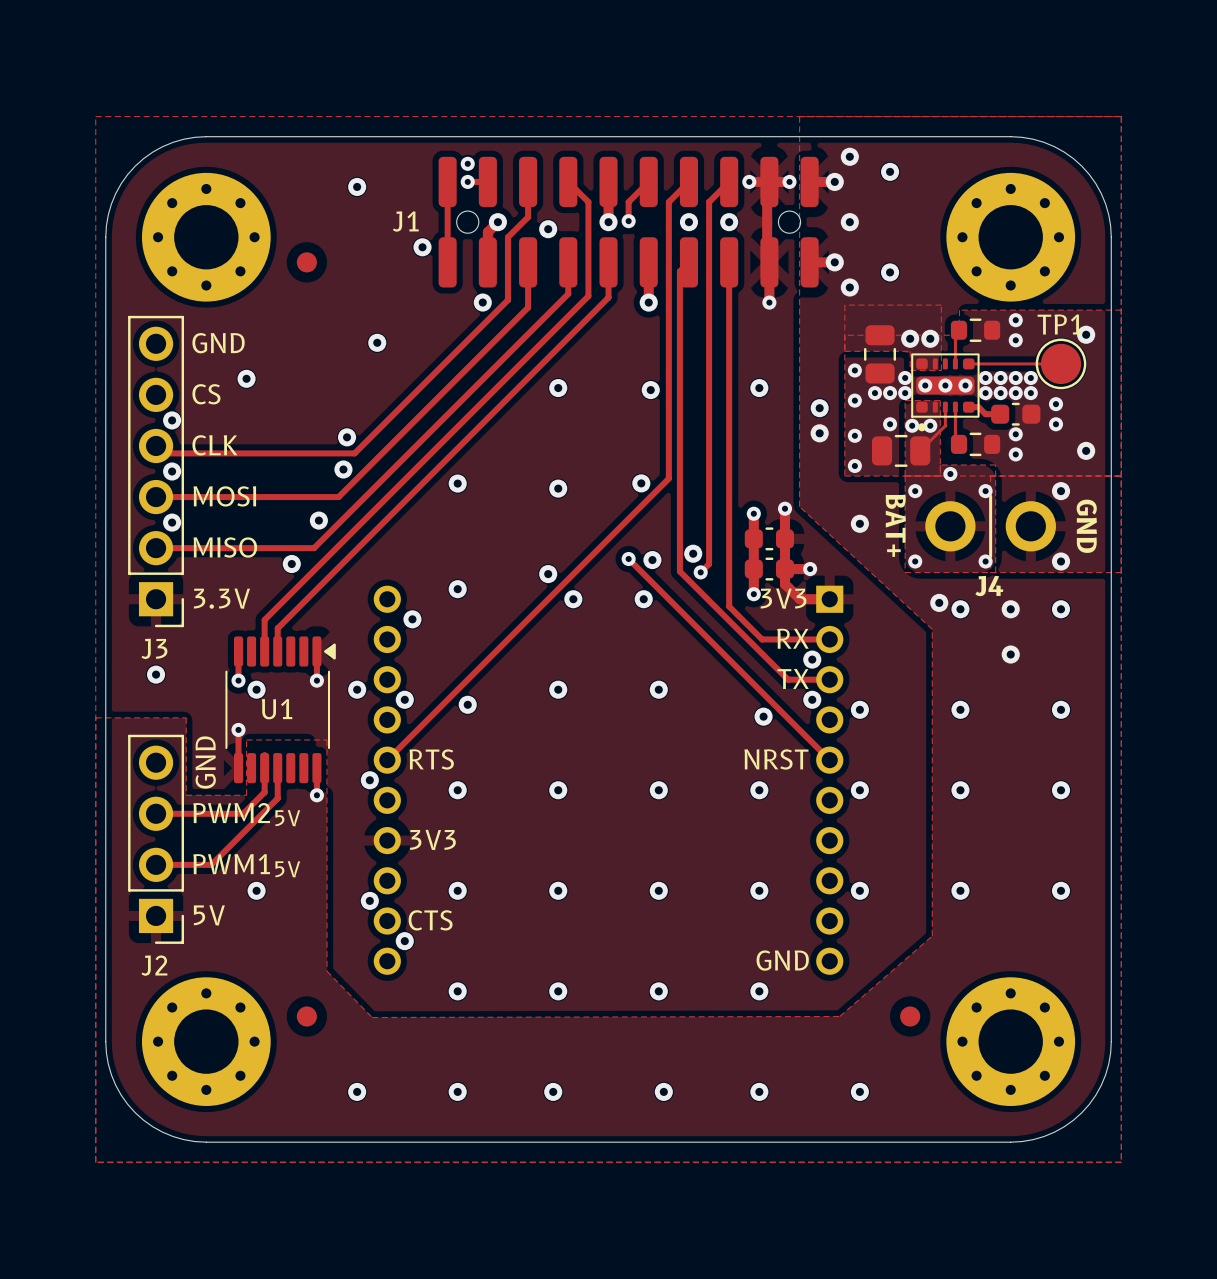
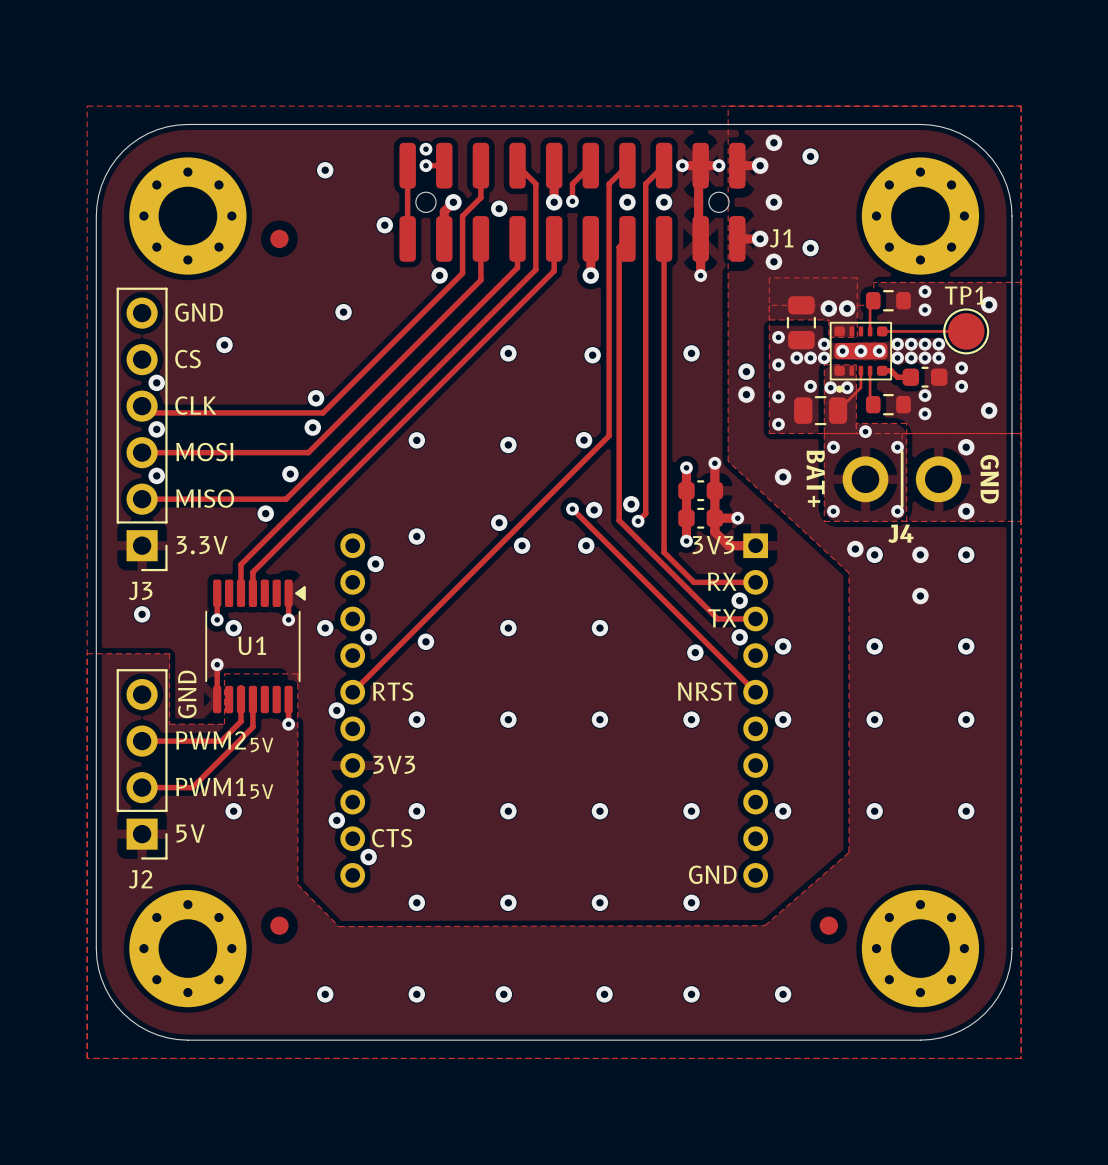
J1 name position: J1 (405, 221) -> J1 (781, 238)

